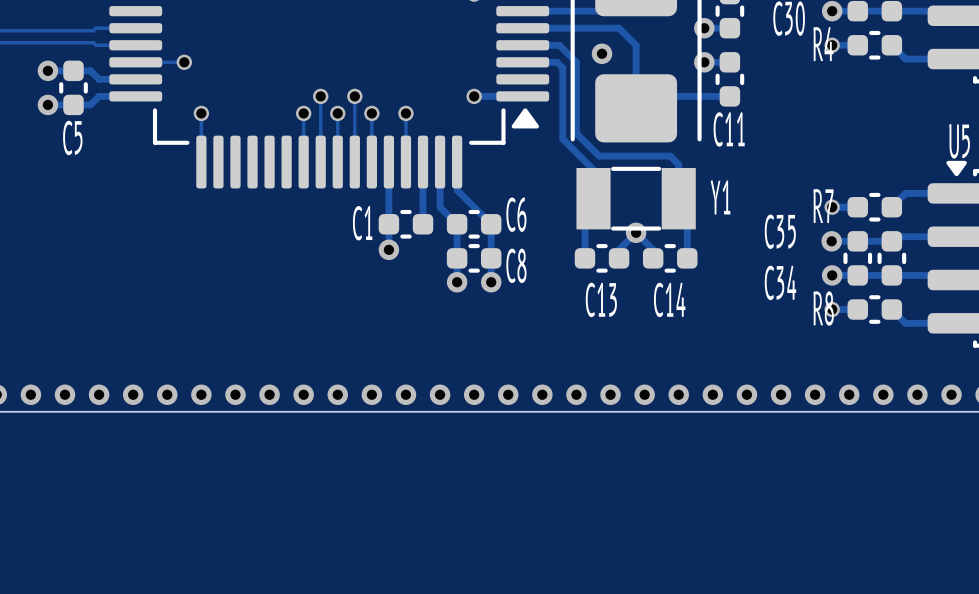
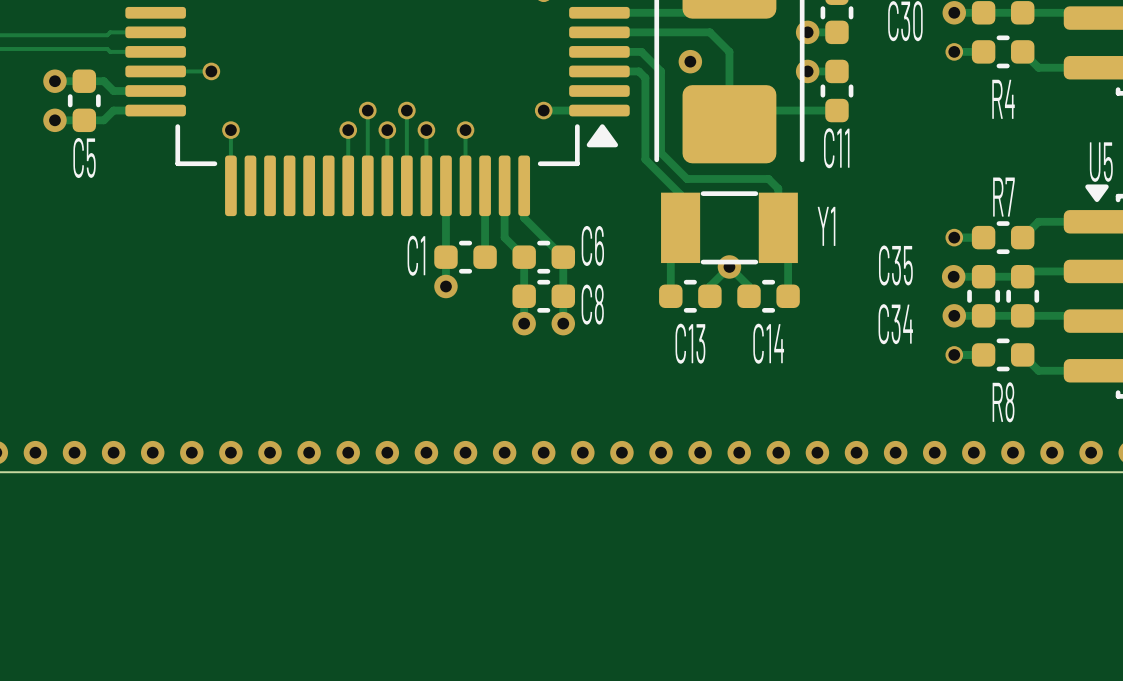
R4 name position: R4 (823, 43) -> R4 (1003, 99)
R7 name position: R7 (823, 206) -> R7 (1003, 197)
R8 name position: R8 (823, 308) -> R8 (1003, 402)

